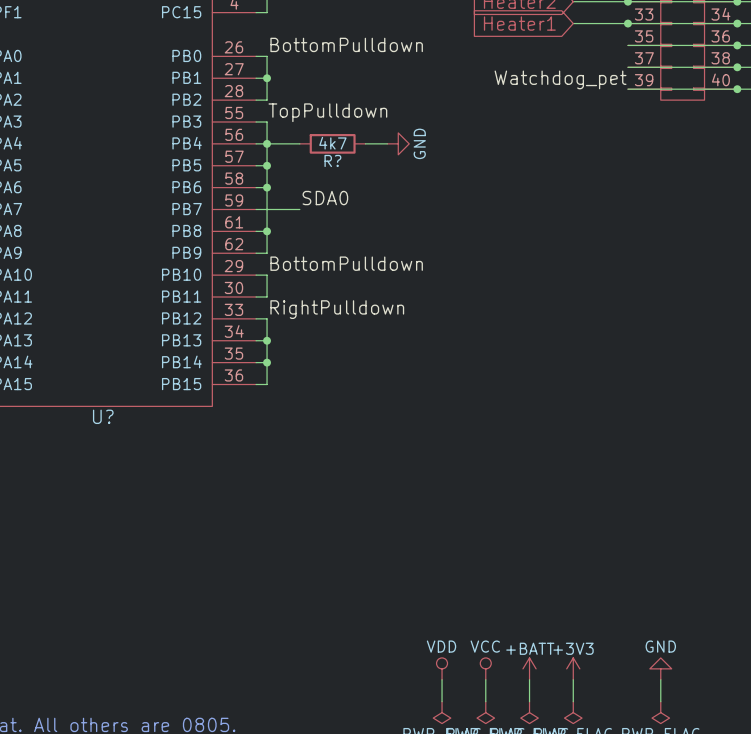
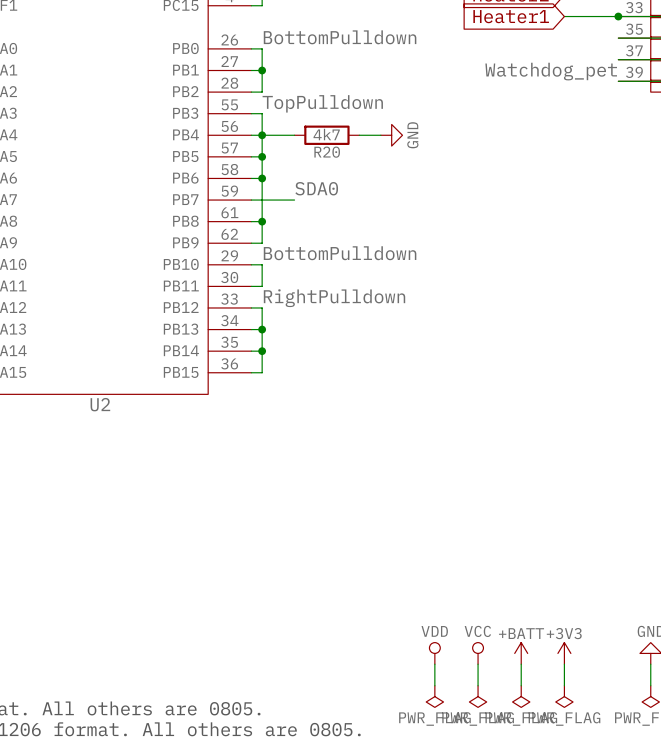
R? name: R? (332, 160) -> R20 (327, 152)
U? name: U? (103, 416) -> U2 (100, 404)

